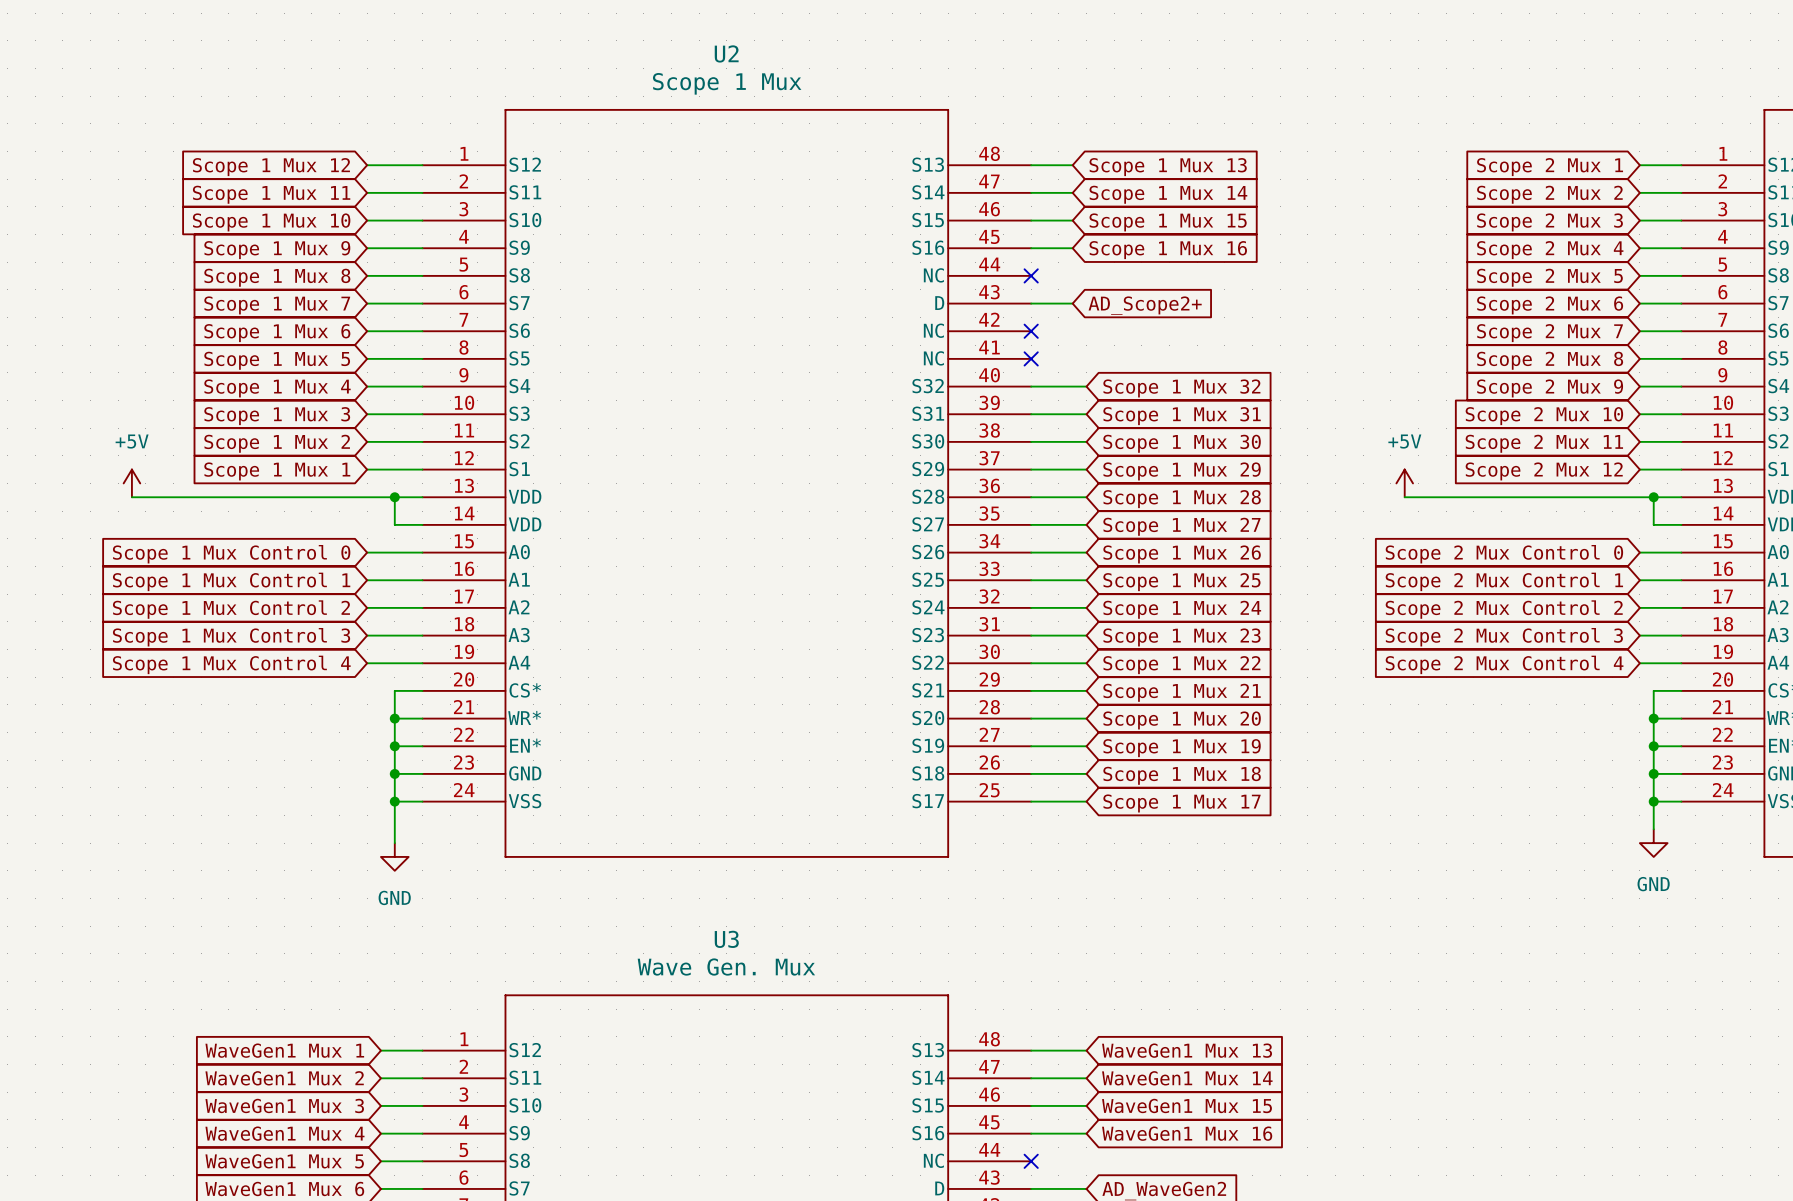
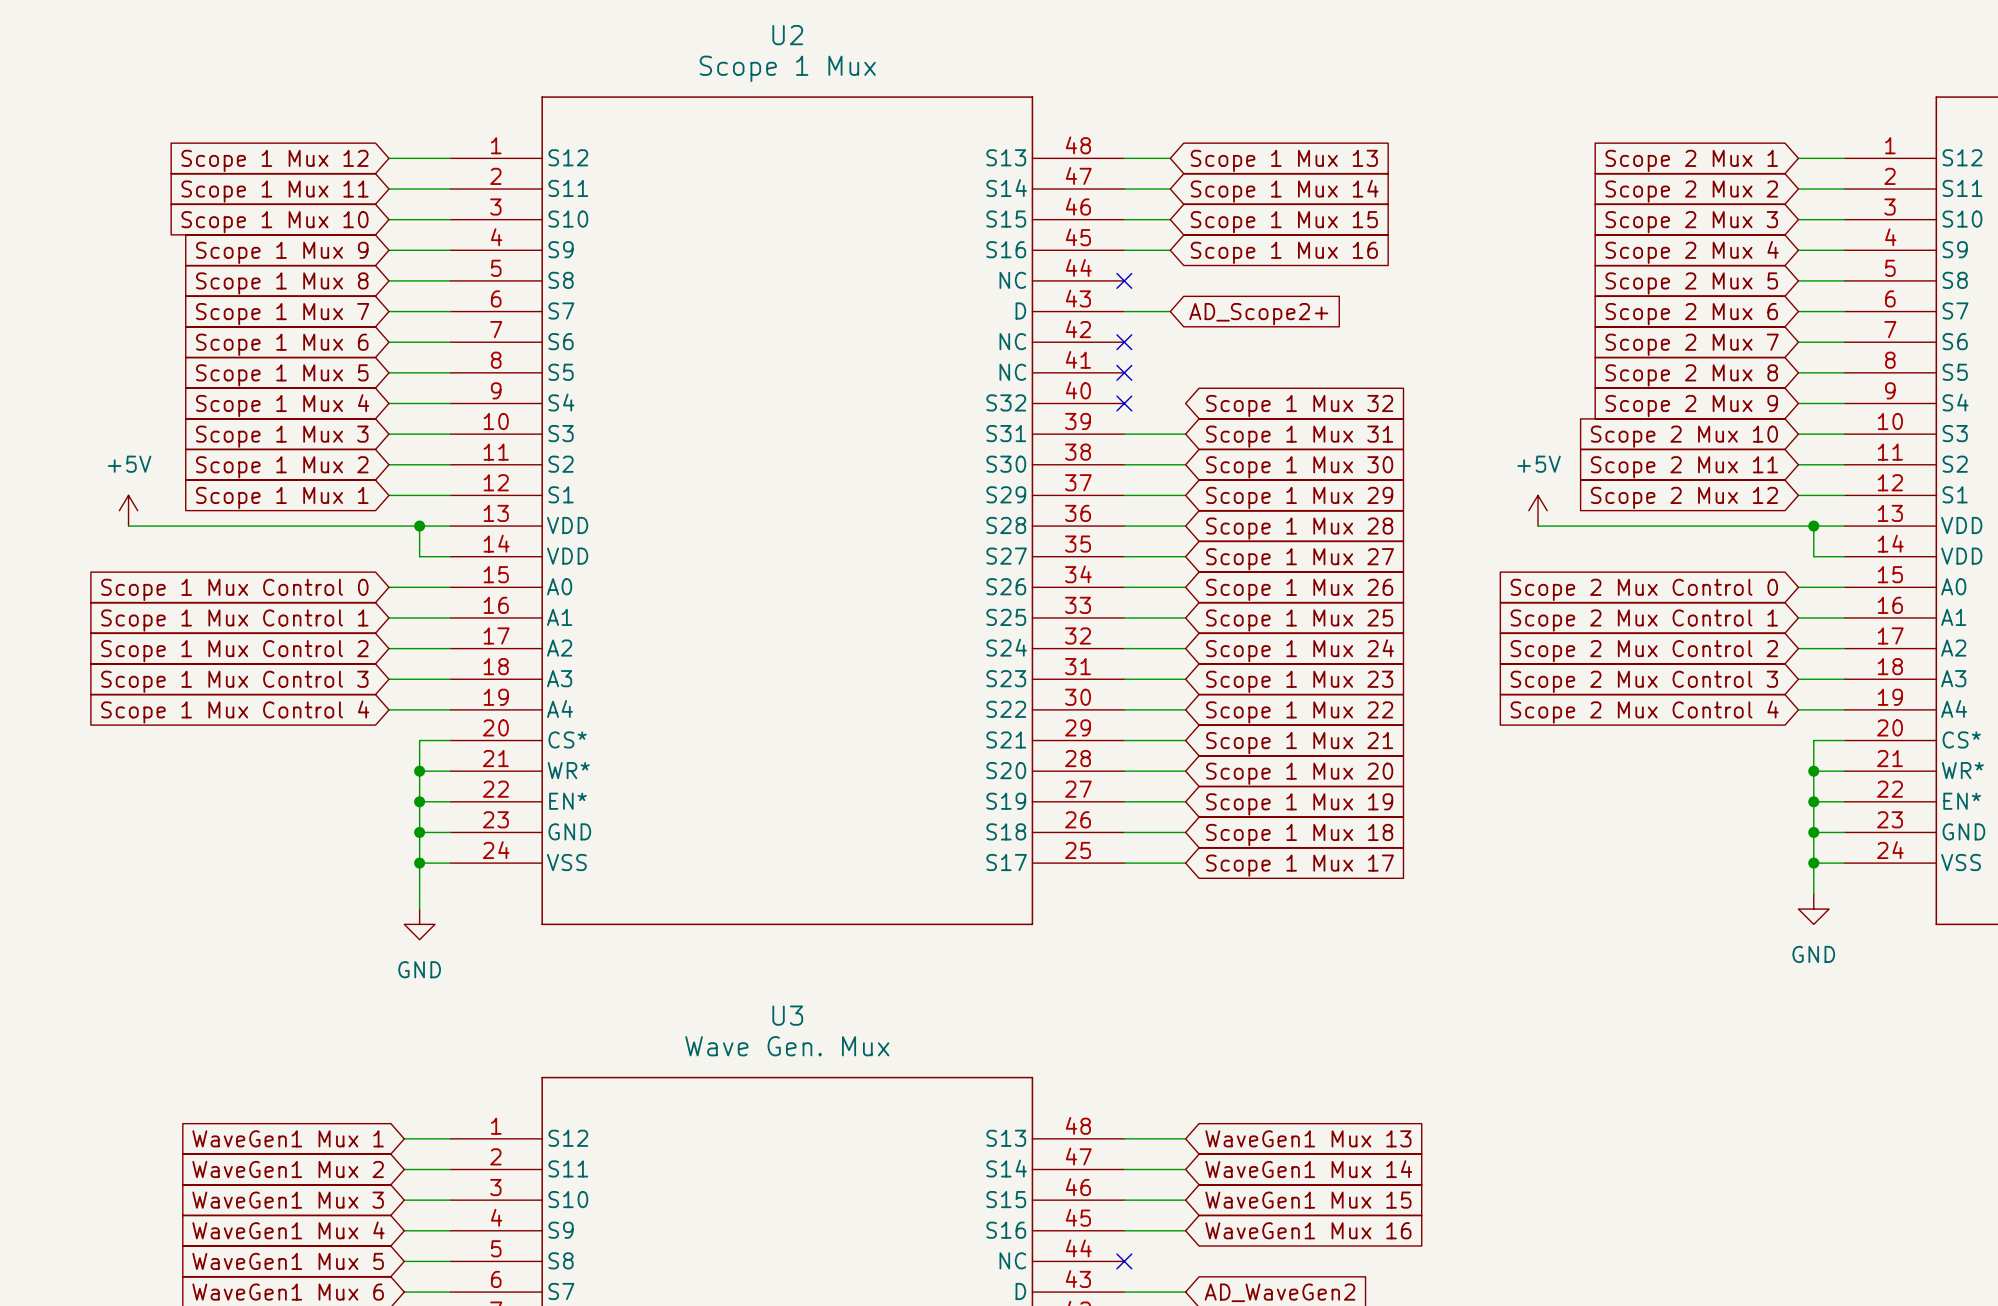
wire: (1031, 386) (1086, 386) -> none
no-connect mark: none -> (1124, 403)

